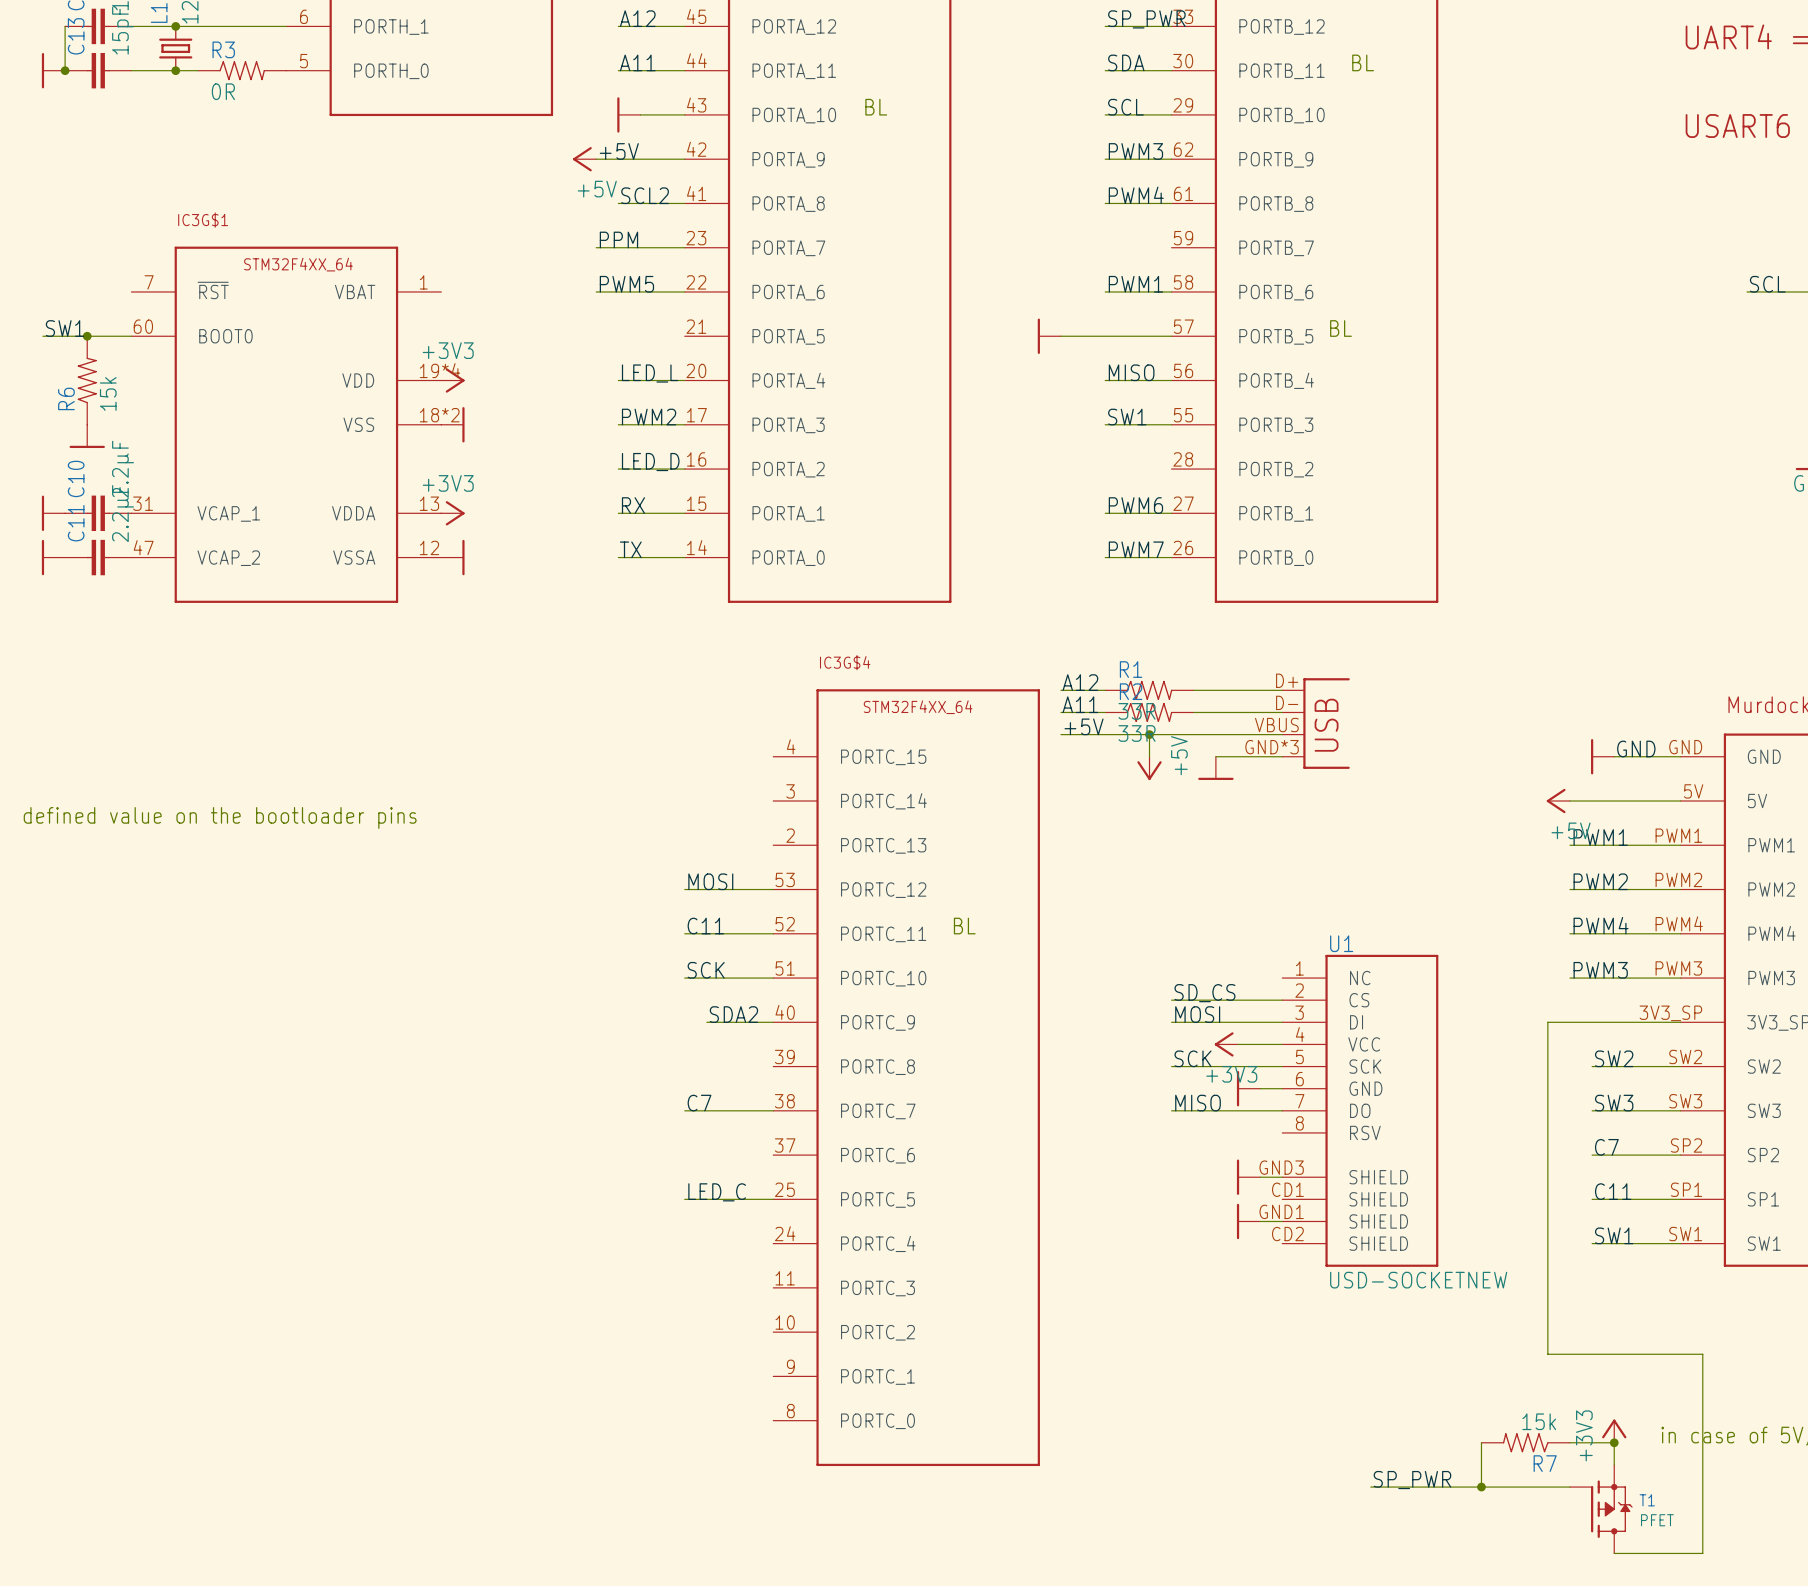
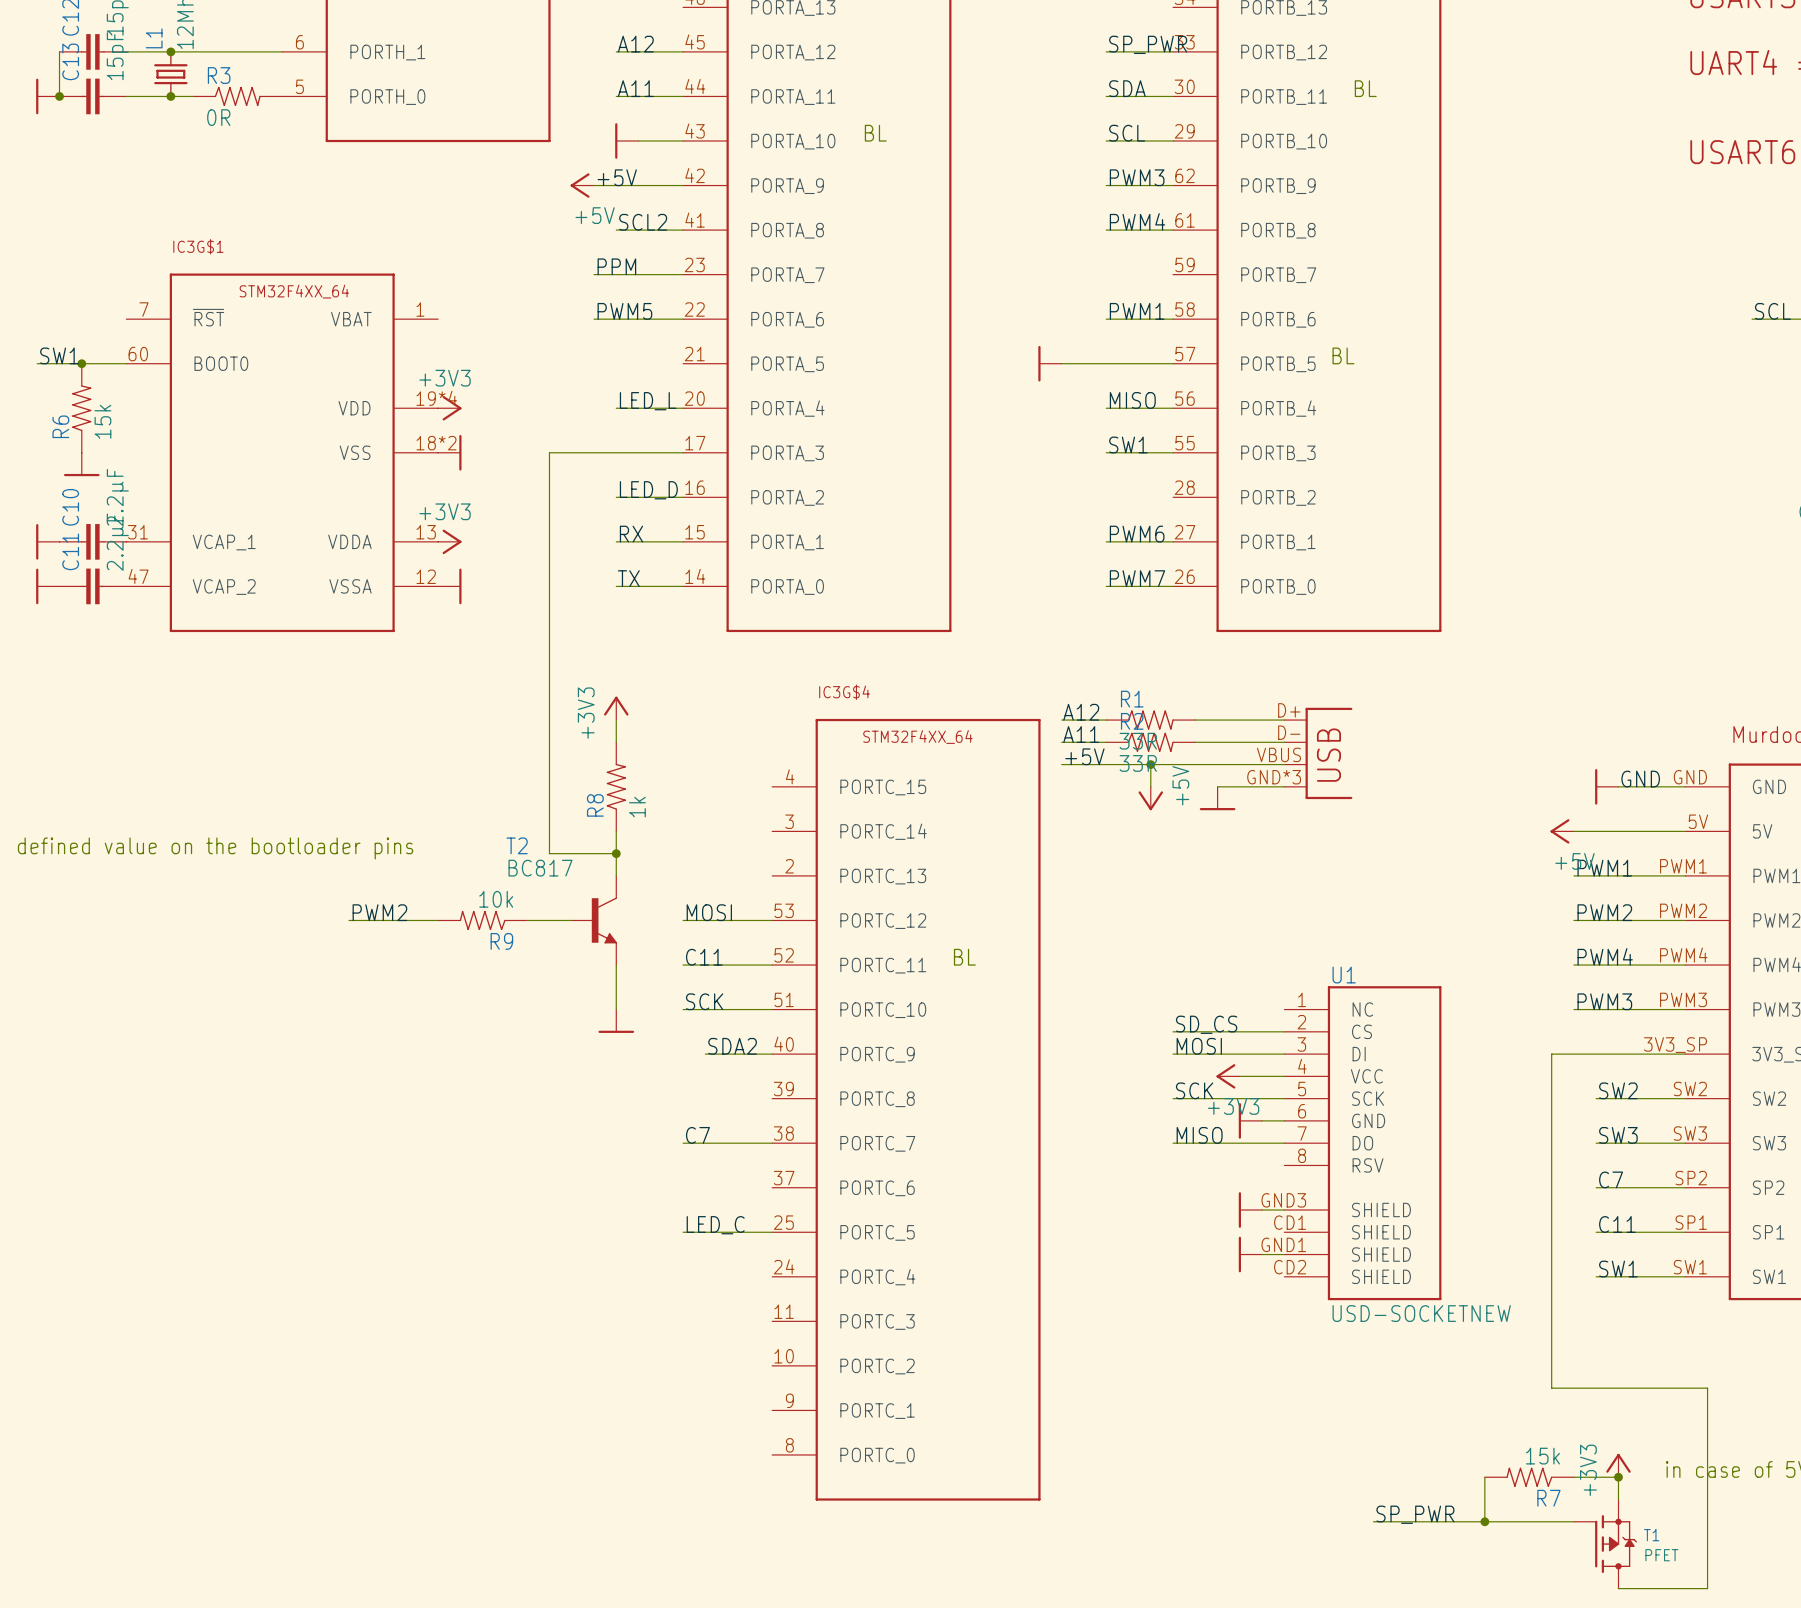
label: PWM2 (649, 417) -> none
wire: none -> (616, 452) (549, 452) (549, 853) (616, 853)
power symbol: none -> +3V3 (616, 708)
wire: none -> (616, 720) (616, 742)
R8: none -> 1k (616, 786)
wire: none -> (616, 831) (616, 875)
junction: none -> (616, 853)
label: none -> PWM2 (379, 912)
wire: none -> (349, 920) (438, 920)
R9: none -> 10k (482, 920)
wire: none -> (527, 920) (571, 920)
T2: none -> BC817 (594, 920)
wire: none -> (616, 965) (616, 1009)
power symbol: none -> (616, 1021)

